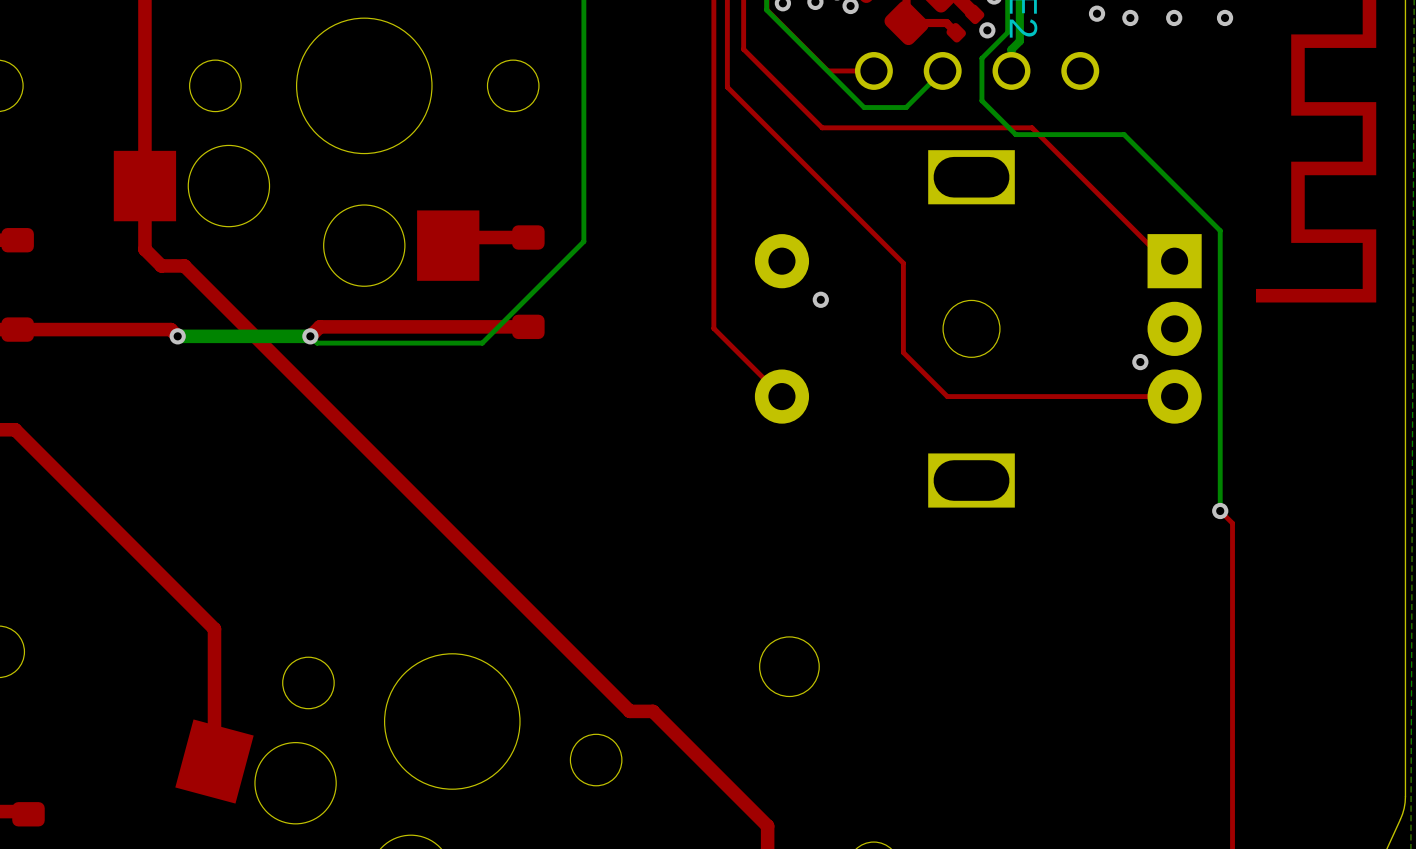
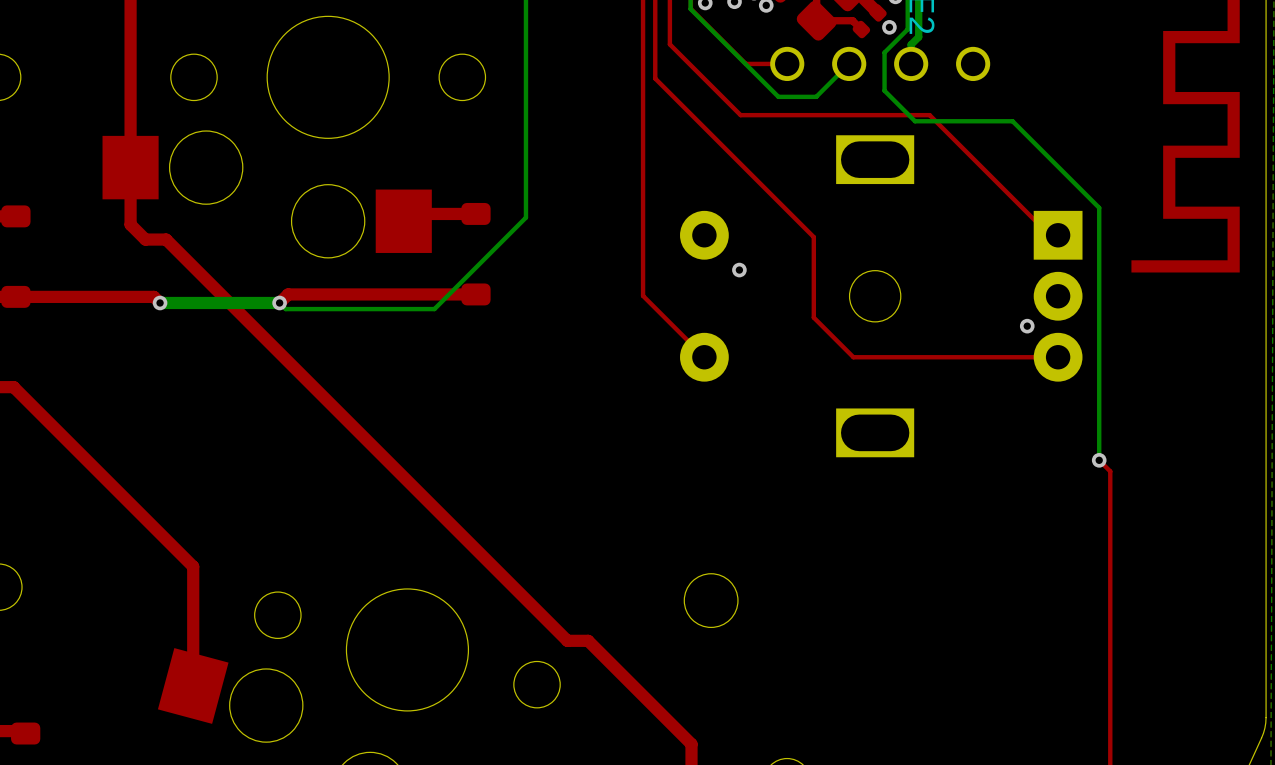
via: (1097, 13) -> none
via: (1130, 17) -> none
via: (1174, 17) -> none
via: (1225, 17) -> none

